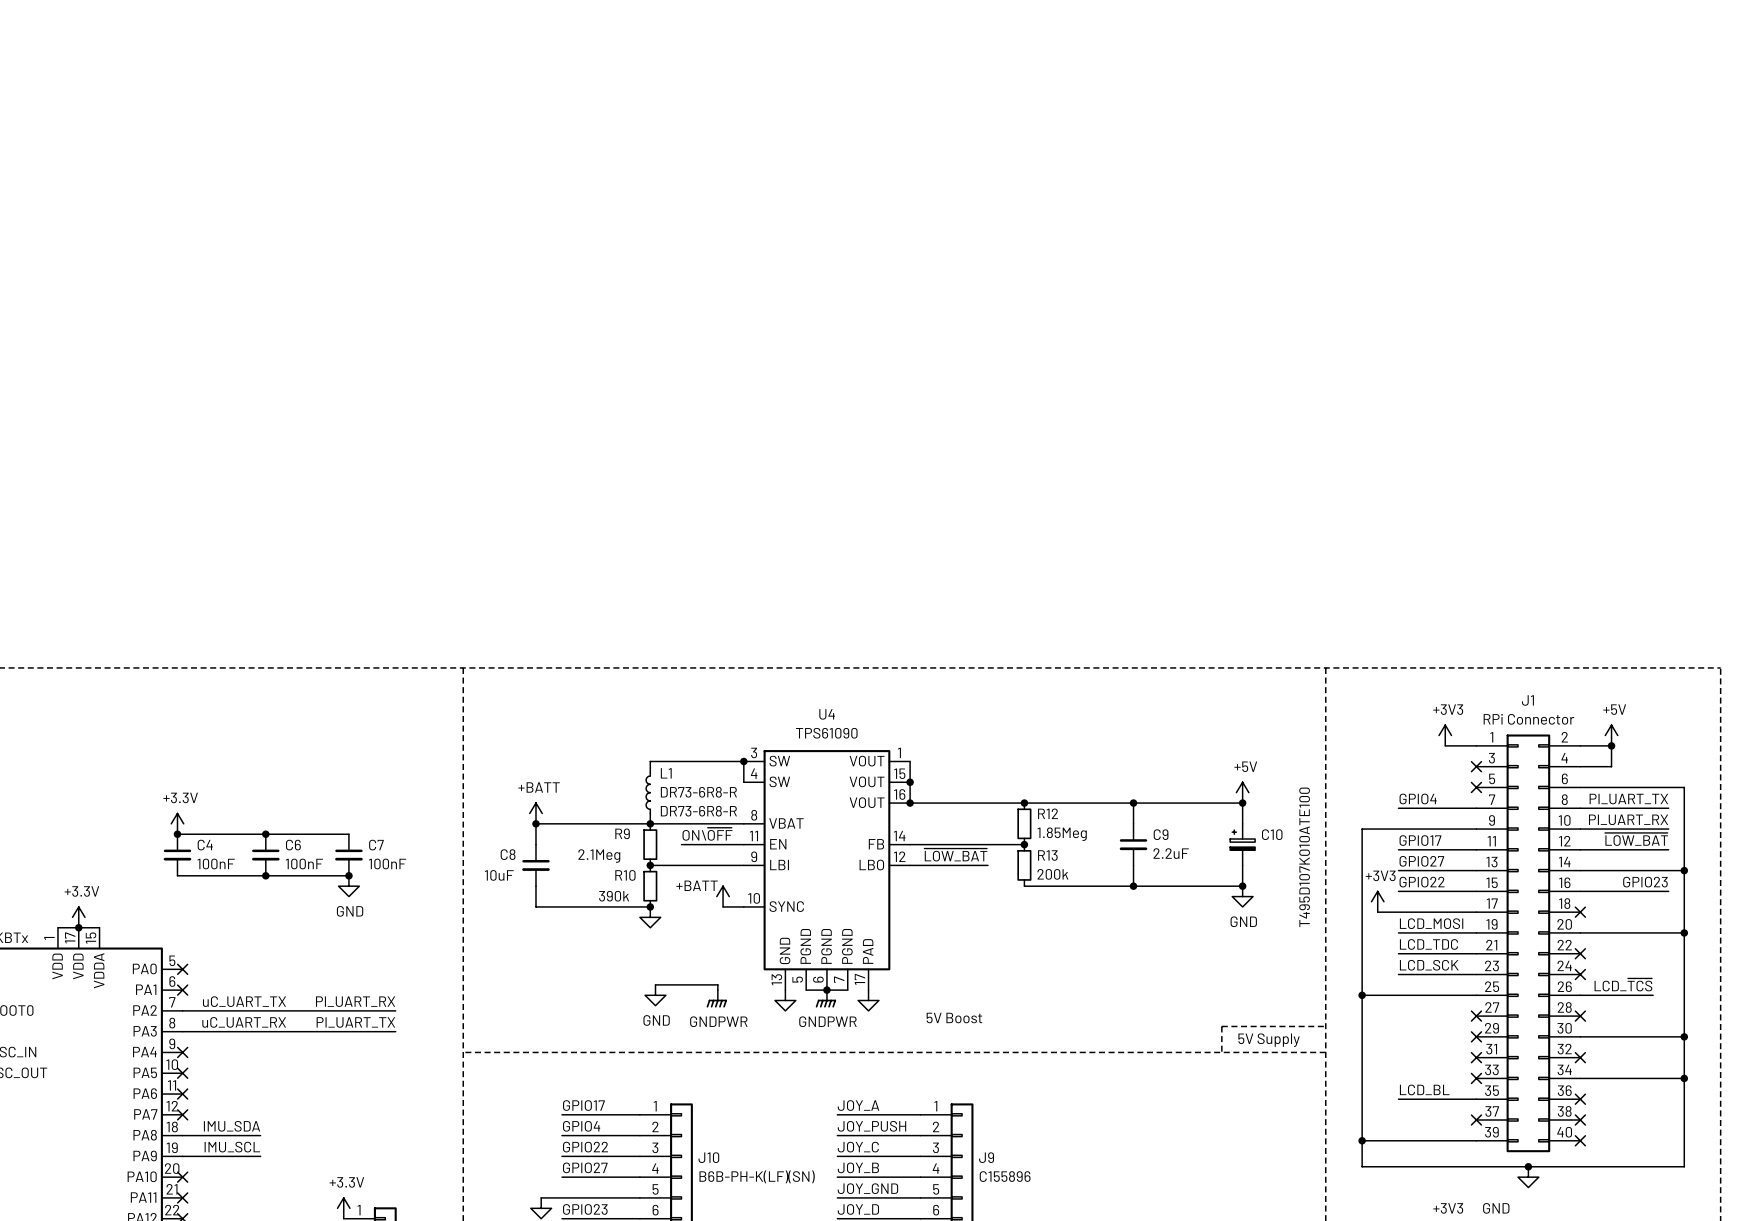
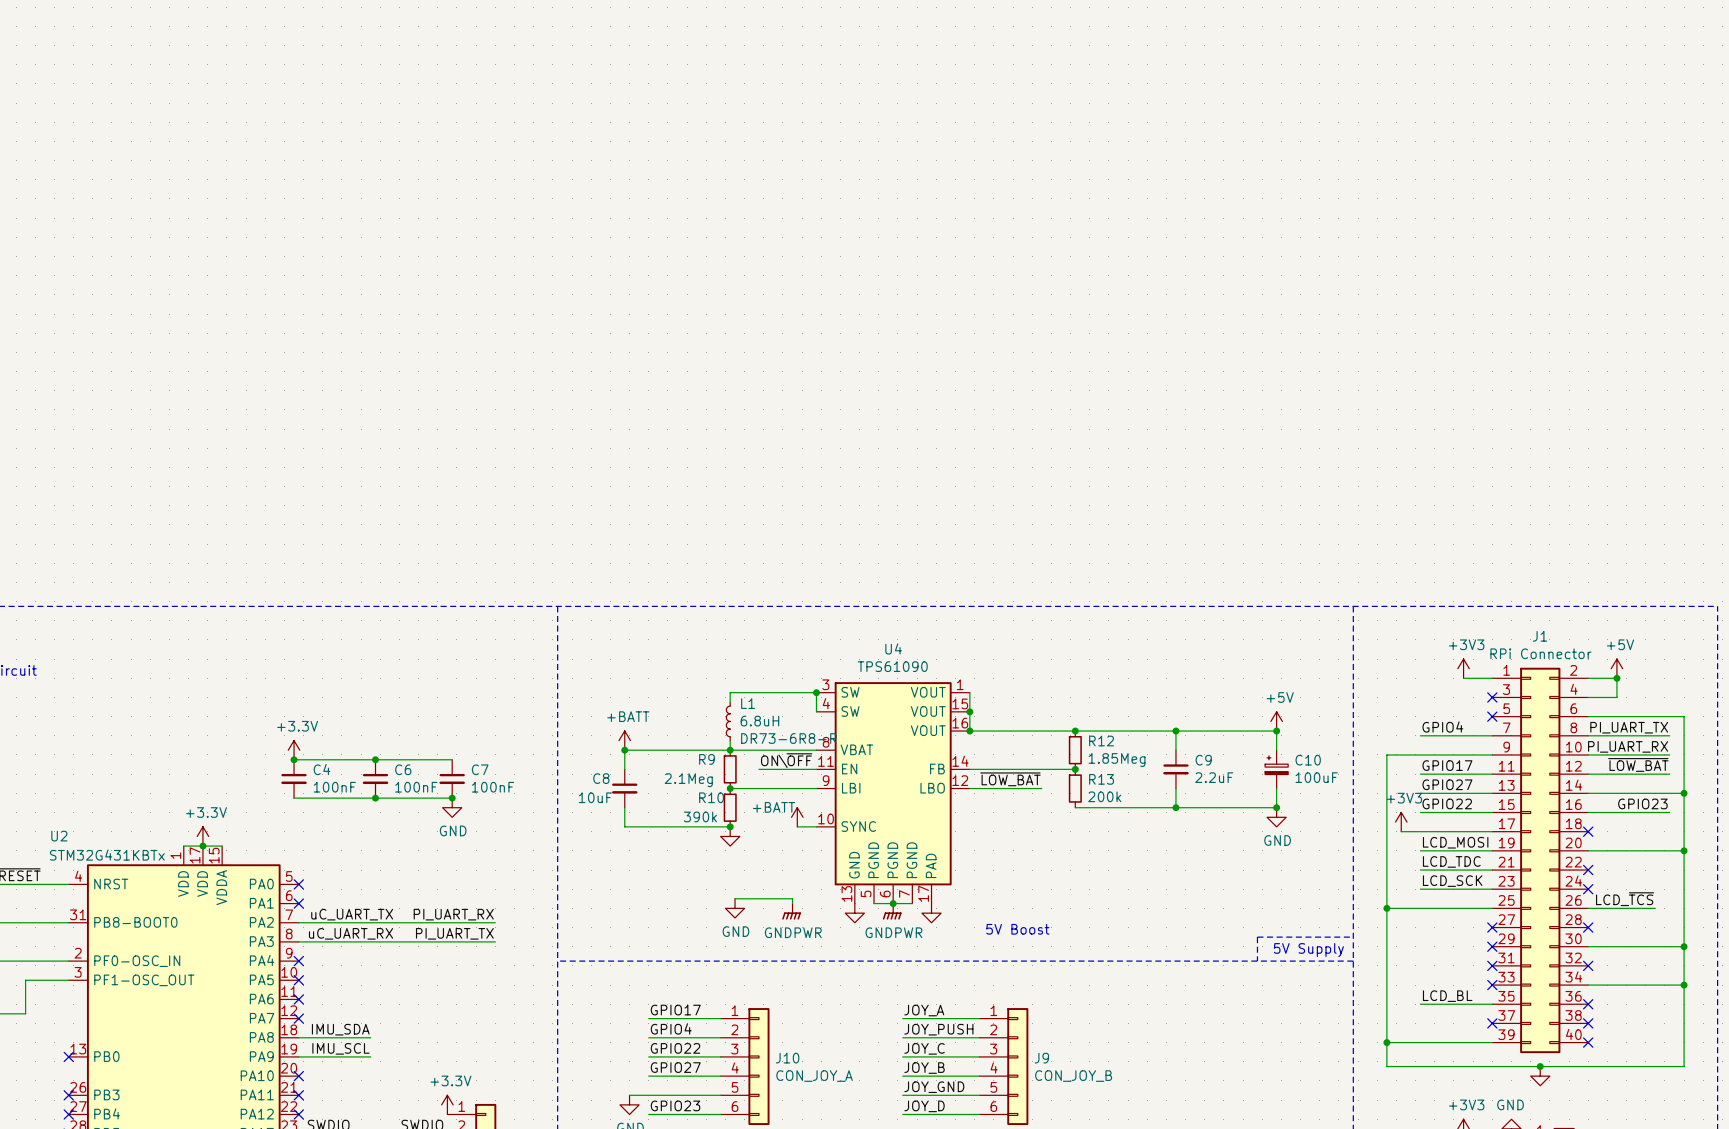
L1 value: DR73-6R8-R (698, 792) -> 6.8uH (759, 721)
C10 value: T495D107K010ATE100 (1304, 857) -> 100uF (1316, 777)
J10 value: B6B-PH-K(LF)(SN) (757, 1176) -> CON_JOY_A (814, 1076)
J9 value: C155896 (1005, 1176) -> CON_JOY_B (1073, 1076)

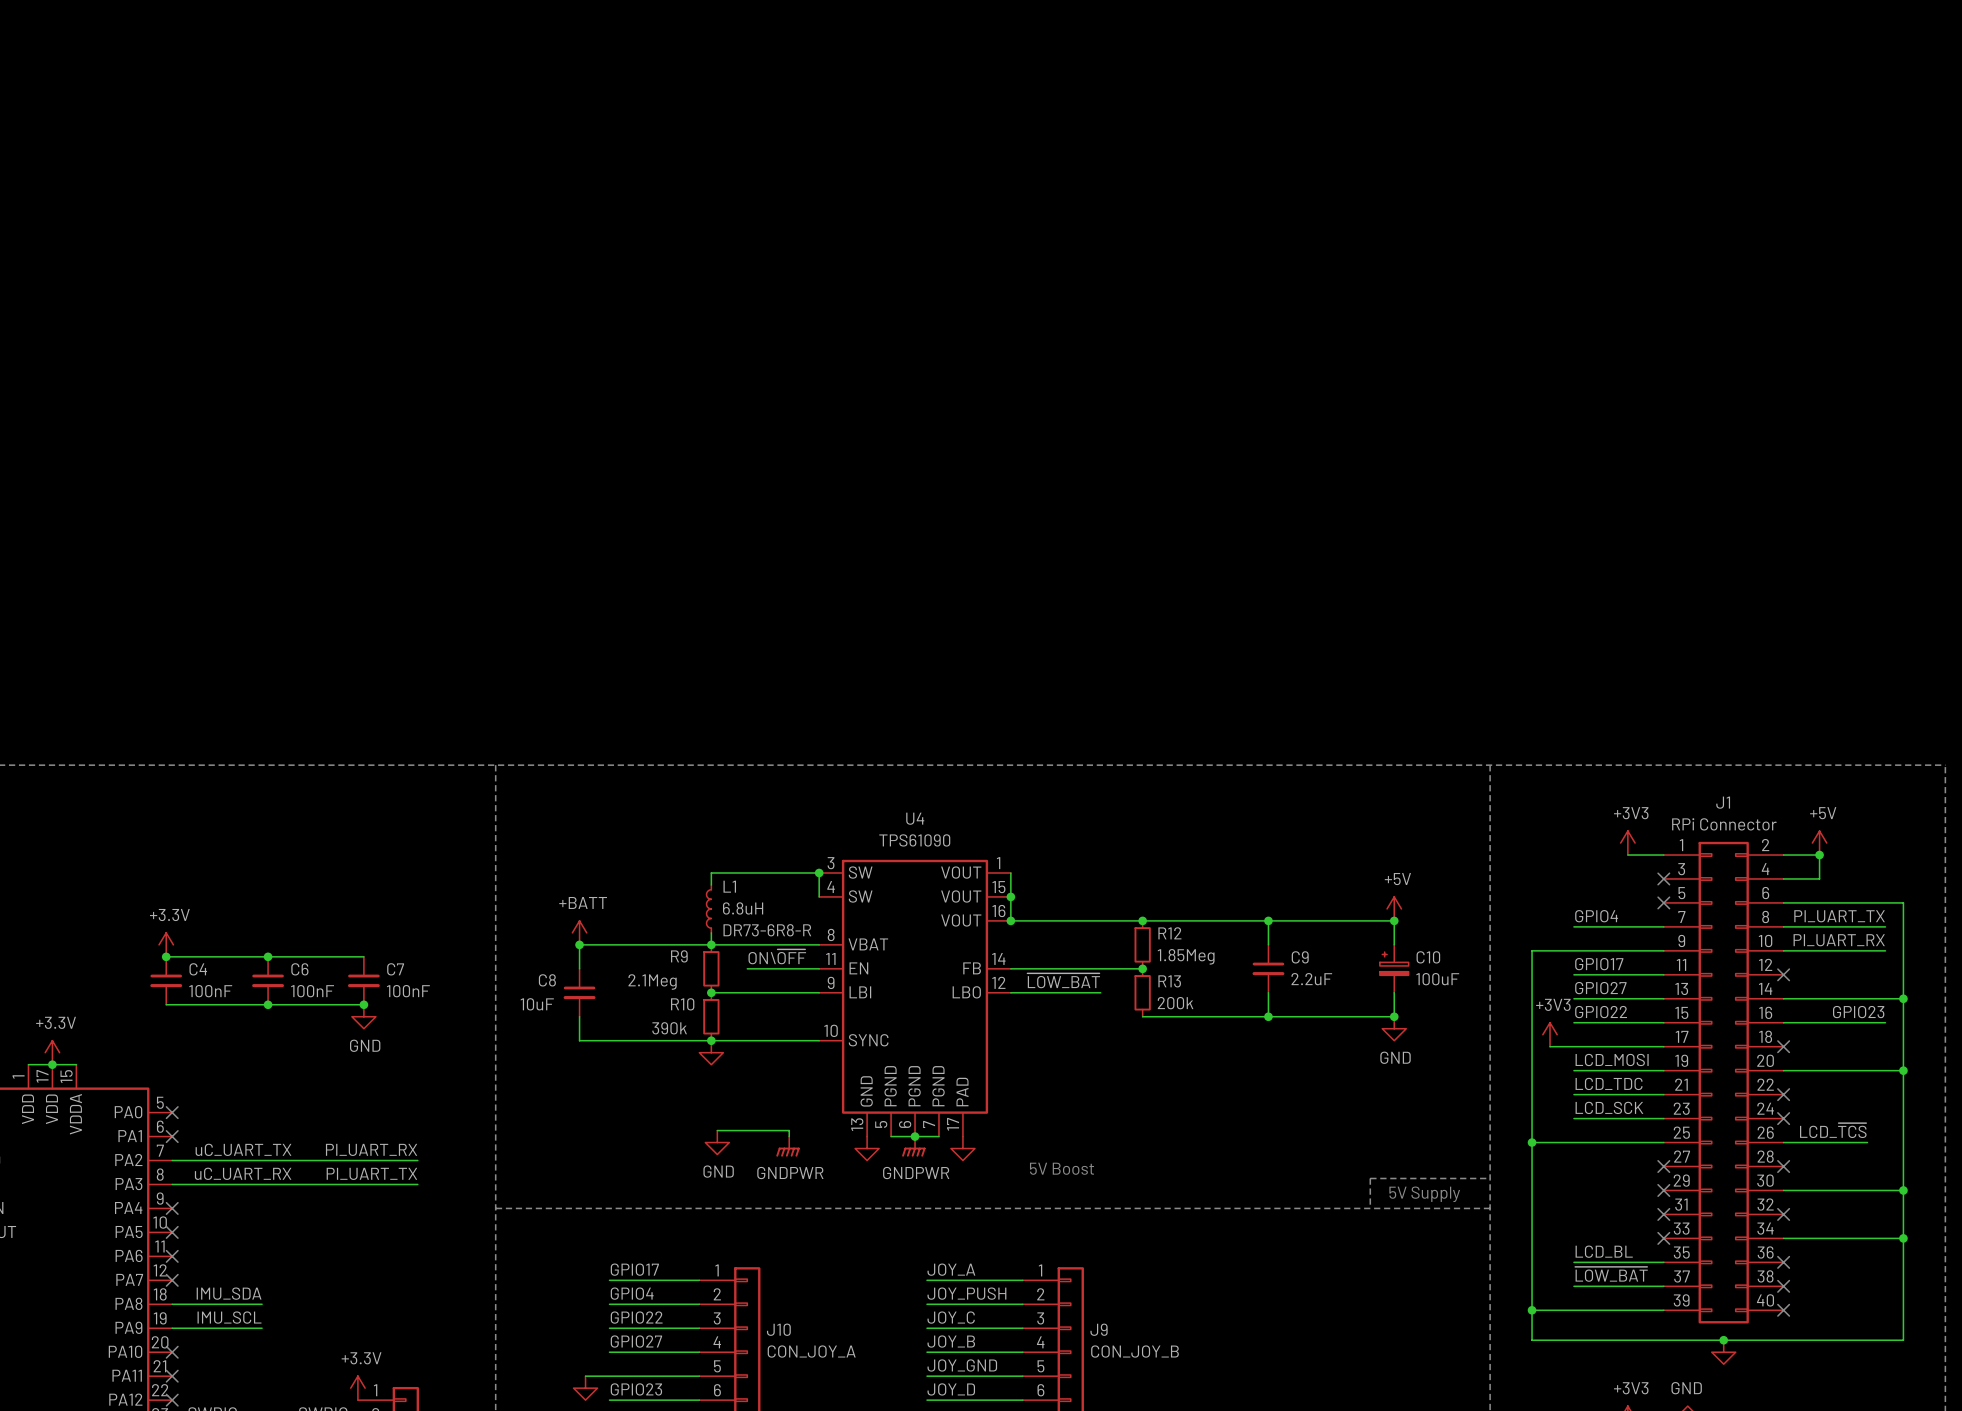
label: ~{LOW_BAT} (1638, 764) -> none
wire: (1588, 774) (1669, 774) -> none
no-connect mark: none -> (1783, 974)
power symbol: +BATT (797, 817) -> none
wire: none -> (711, 1040) (795, 1040)
label: none -> ~{LOW_BAT} (1611, 1274)
wire: none -> (1573, 1286) (1663, 1286)
no-connect mark: (1492, 1023) -> none

